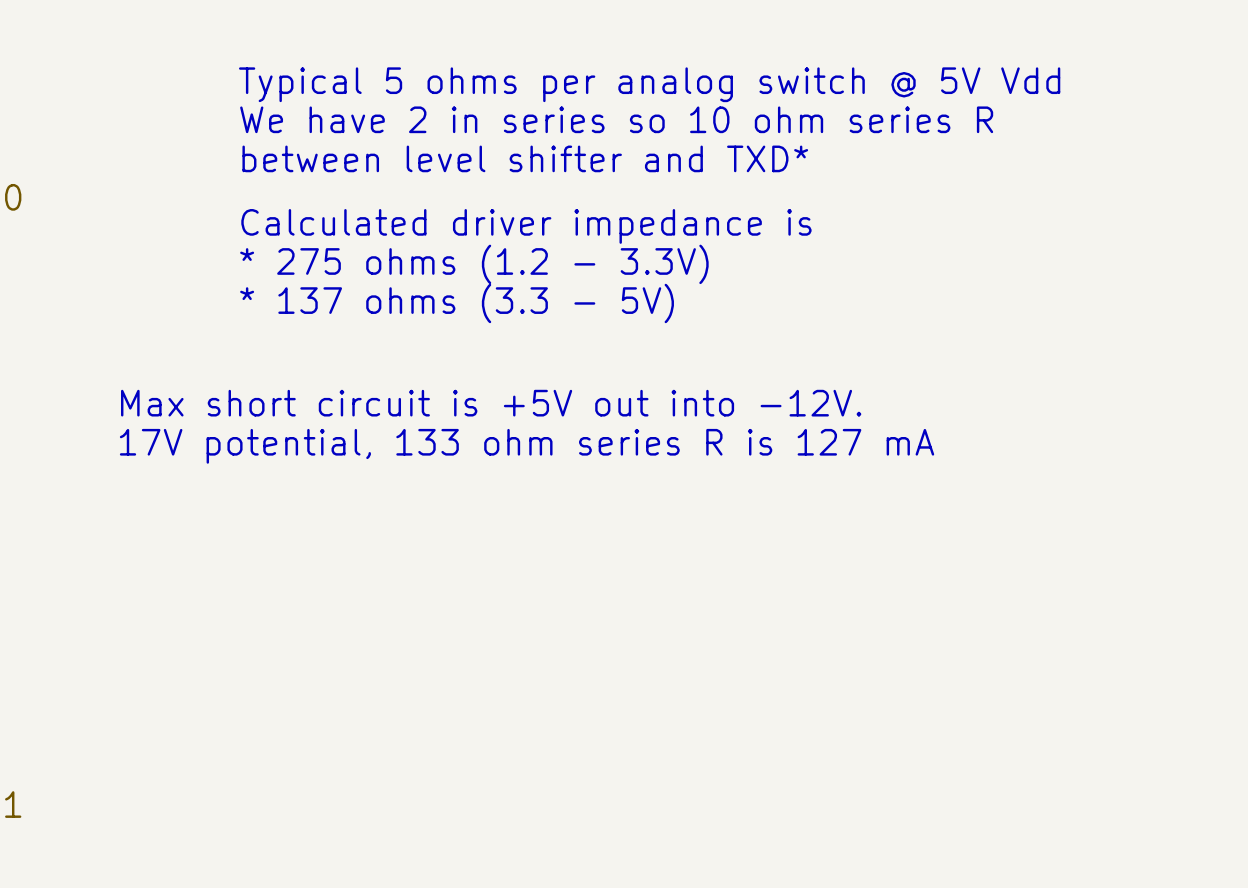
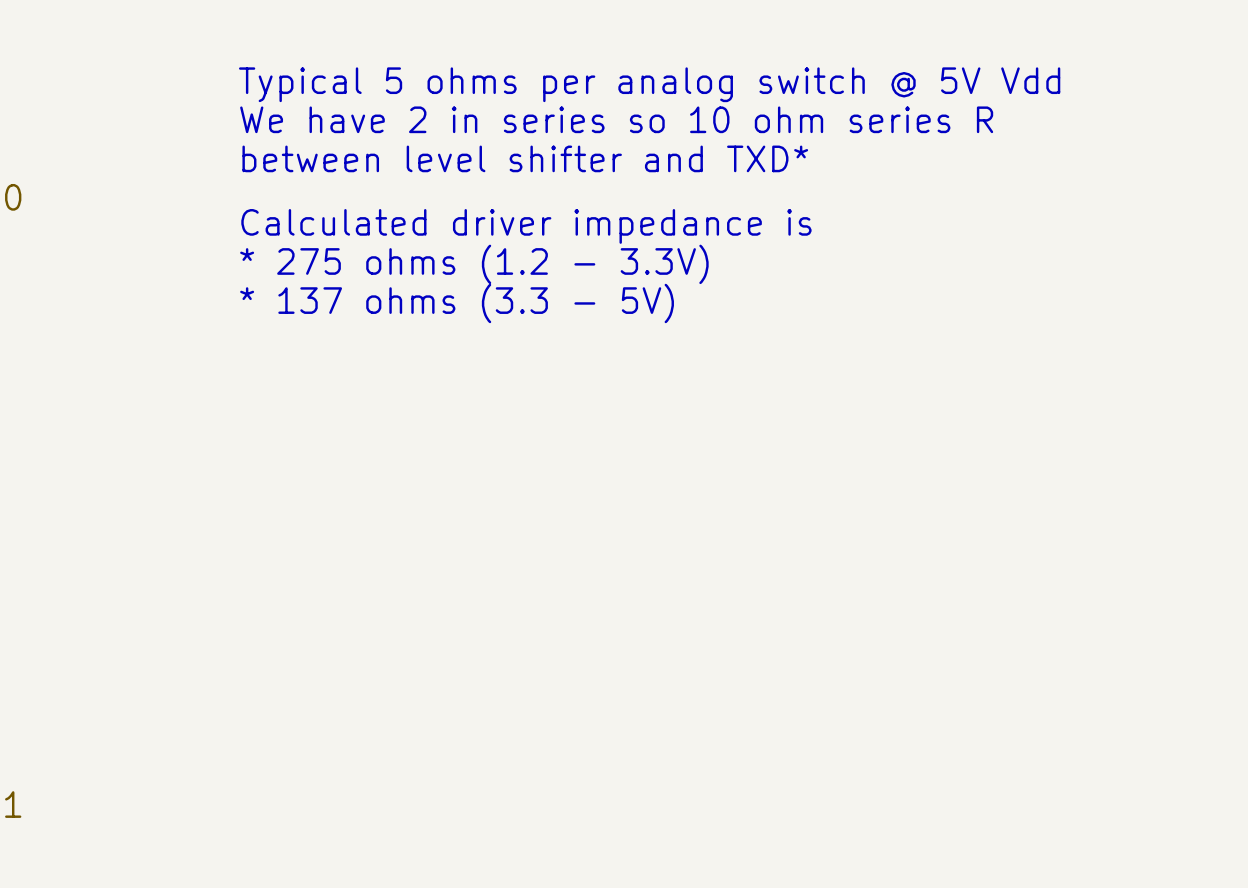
text: Max short circuit is +5V out into -12V. (491, 403) -> none
text: 17V potential, 133 ohm series R is 127 mA (527, 446) -> none

